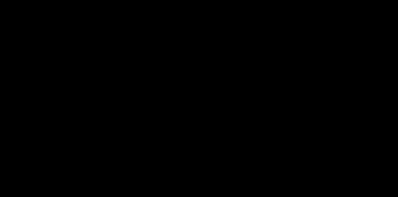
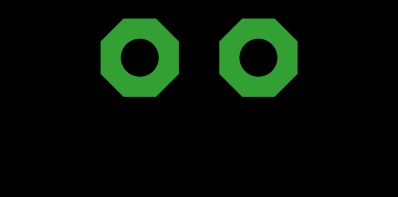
part: none -> (199, 57)

